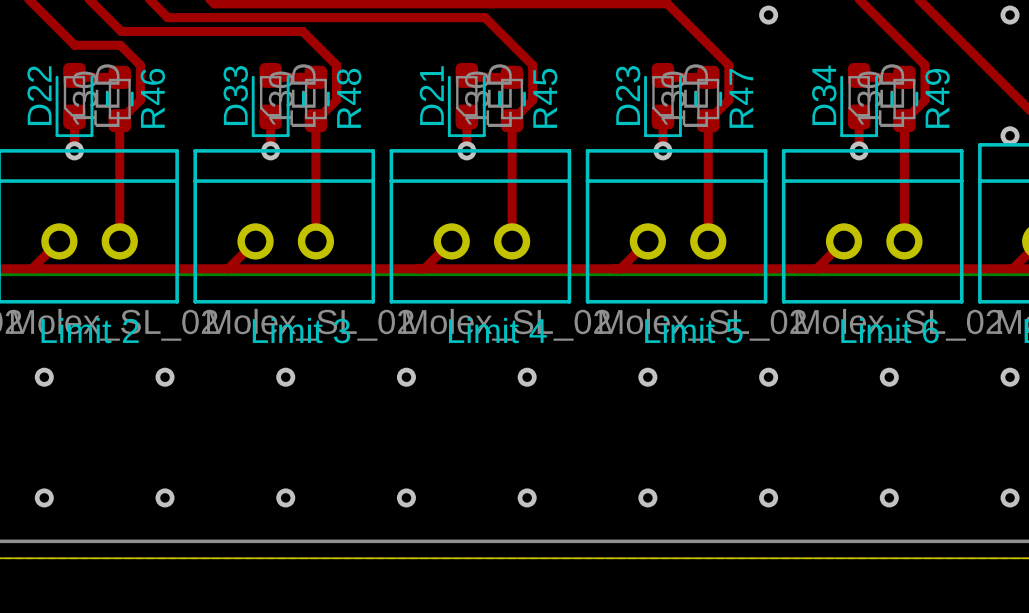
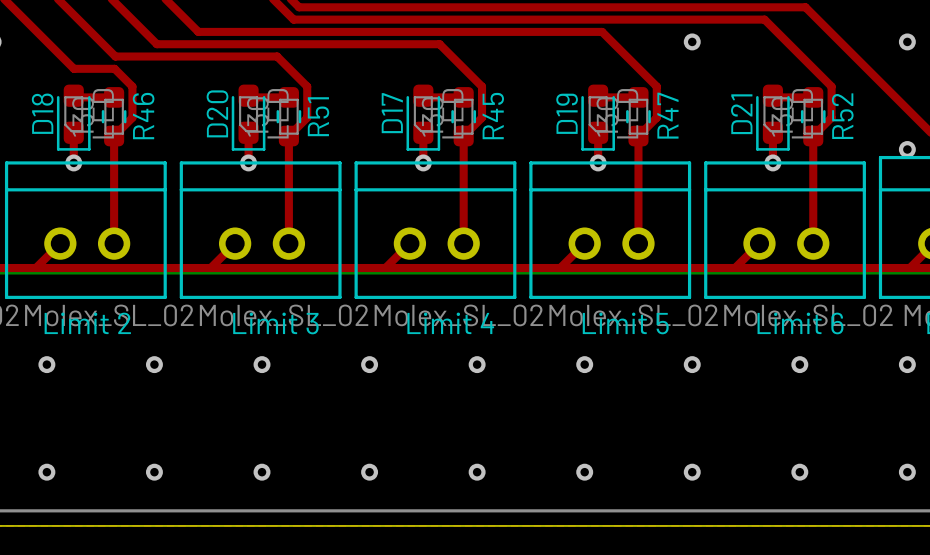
D22 name: D22 (39, 95) -> D18 (42, 113)
D33 name: D33 (235, 95) -> D20 (217, 113)
D21 name: D21 (431, 95) -> D17 (392, 113)
D23 name: D23 (628, 95) -> D19 (567, 113)
D34 name: D34 (824, 95) -> D21 (741, 114)
R48 name: R48 (349, 98) -> R51 (318, 116)
R49 name: R49 (937, 98) -> R52 (842, 116)

